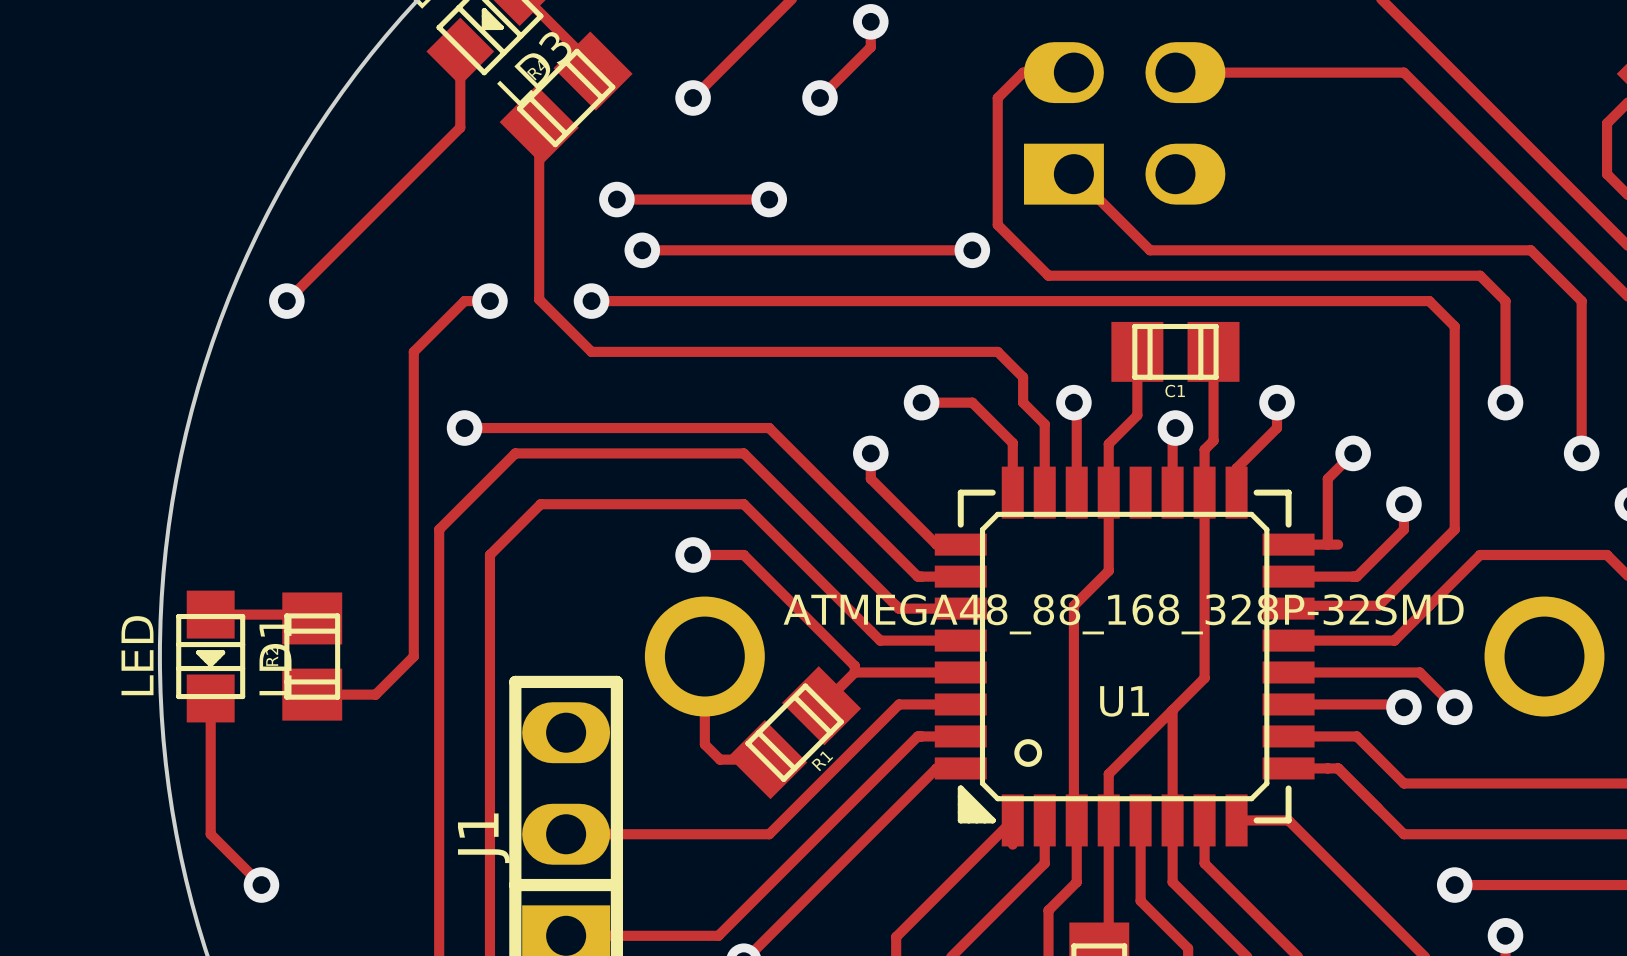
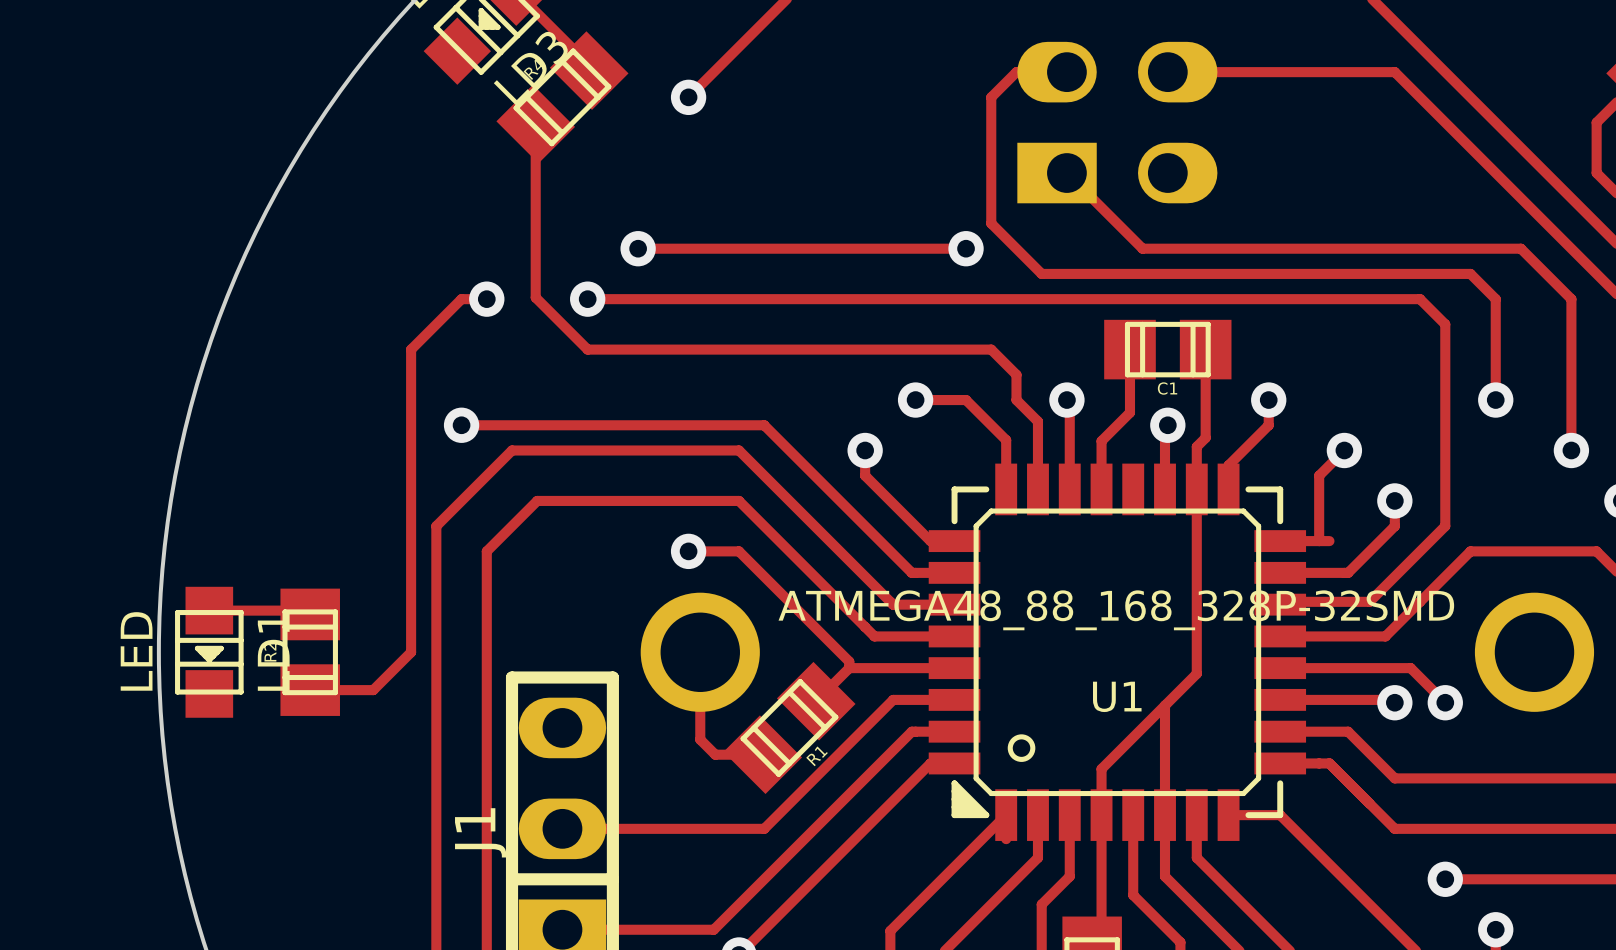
track: (870, 21) (870, 47) (820, 97) -> none
via: (870, 21) -> none
track: (460, 51) (460, 127) (286, 301) -> none
via: (820, 97) -> none
track: (616, 199) (769, 199) -> none
via: (616, 199) -> none
via: (769, 199) -> none
via: (286, 301) -> none
track: (1108, 492) (1108, 570) (1073, 605) (1073, 817) (1076, 820) -> none
track: (210, 698) (210, 834) (261, 885) -> none
via: (261, 885) -> none

